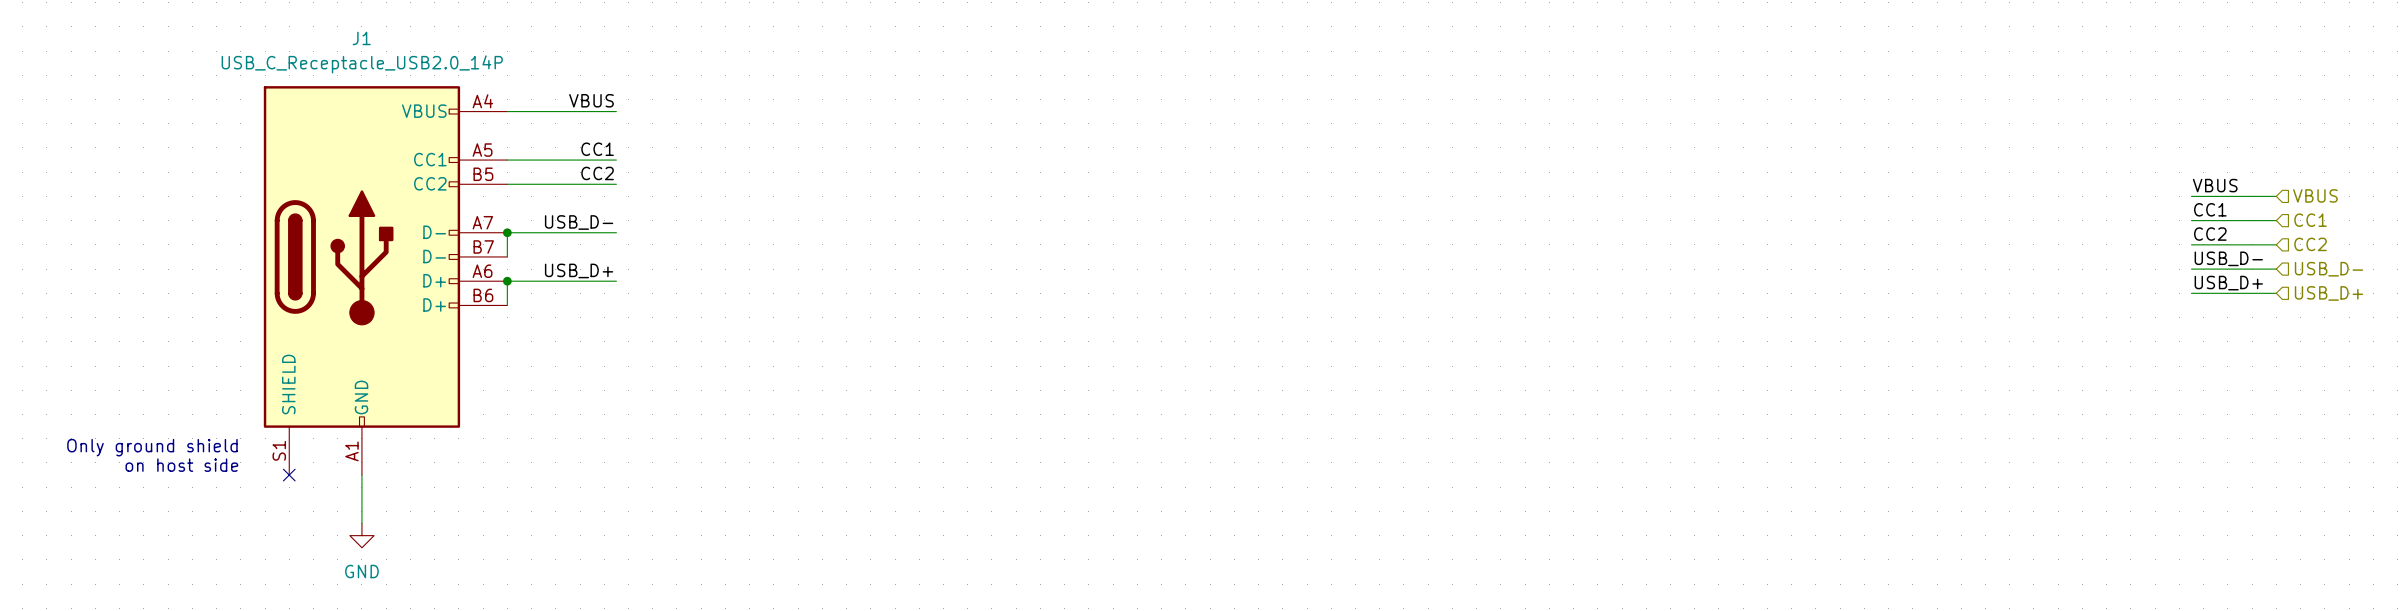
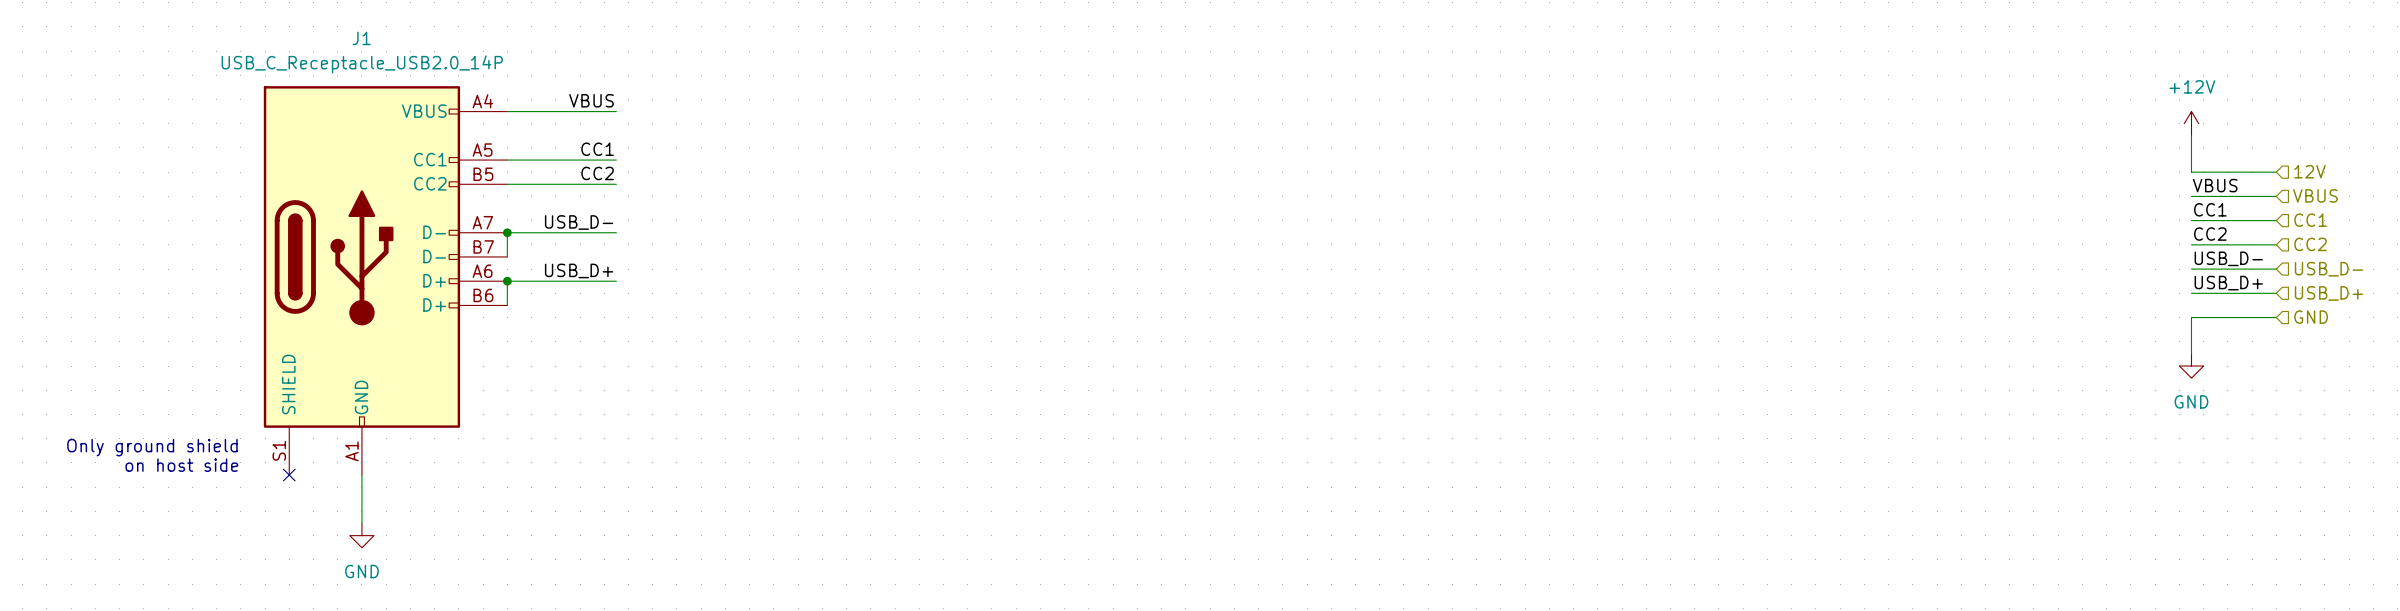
power symbol: none -> +12V (2191, 123)
wire: none -> (2191, 135) (2191, 172) (2276, 172)
hierarchical label: none -> 12V (2309, 171)
wire: none -> (2276, 317) (2191, 317) (2191, 353)
hierarchical label: none -> GND (2311, 317)
power symbol: none -> GND (2191, 366)

